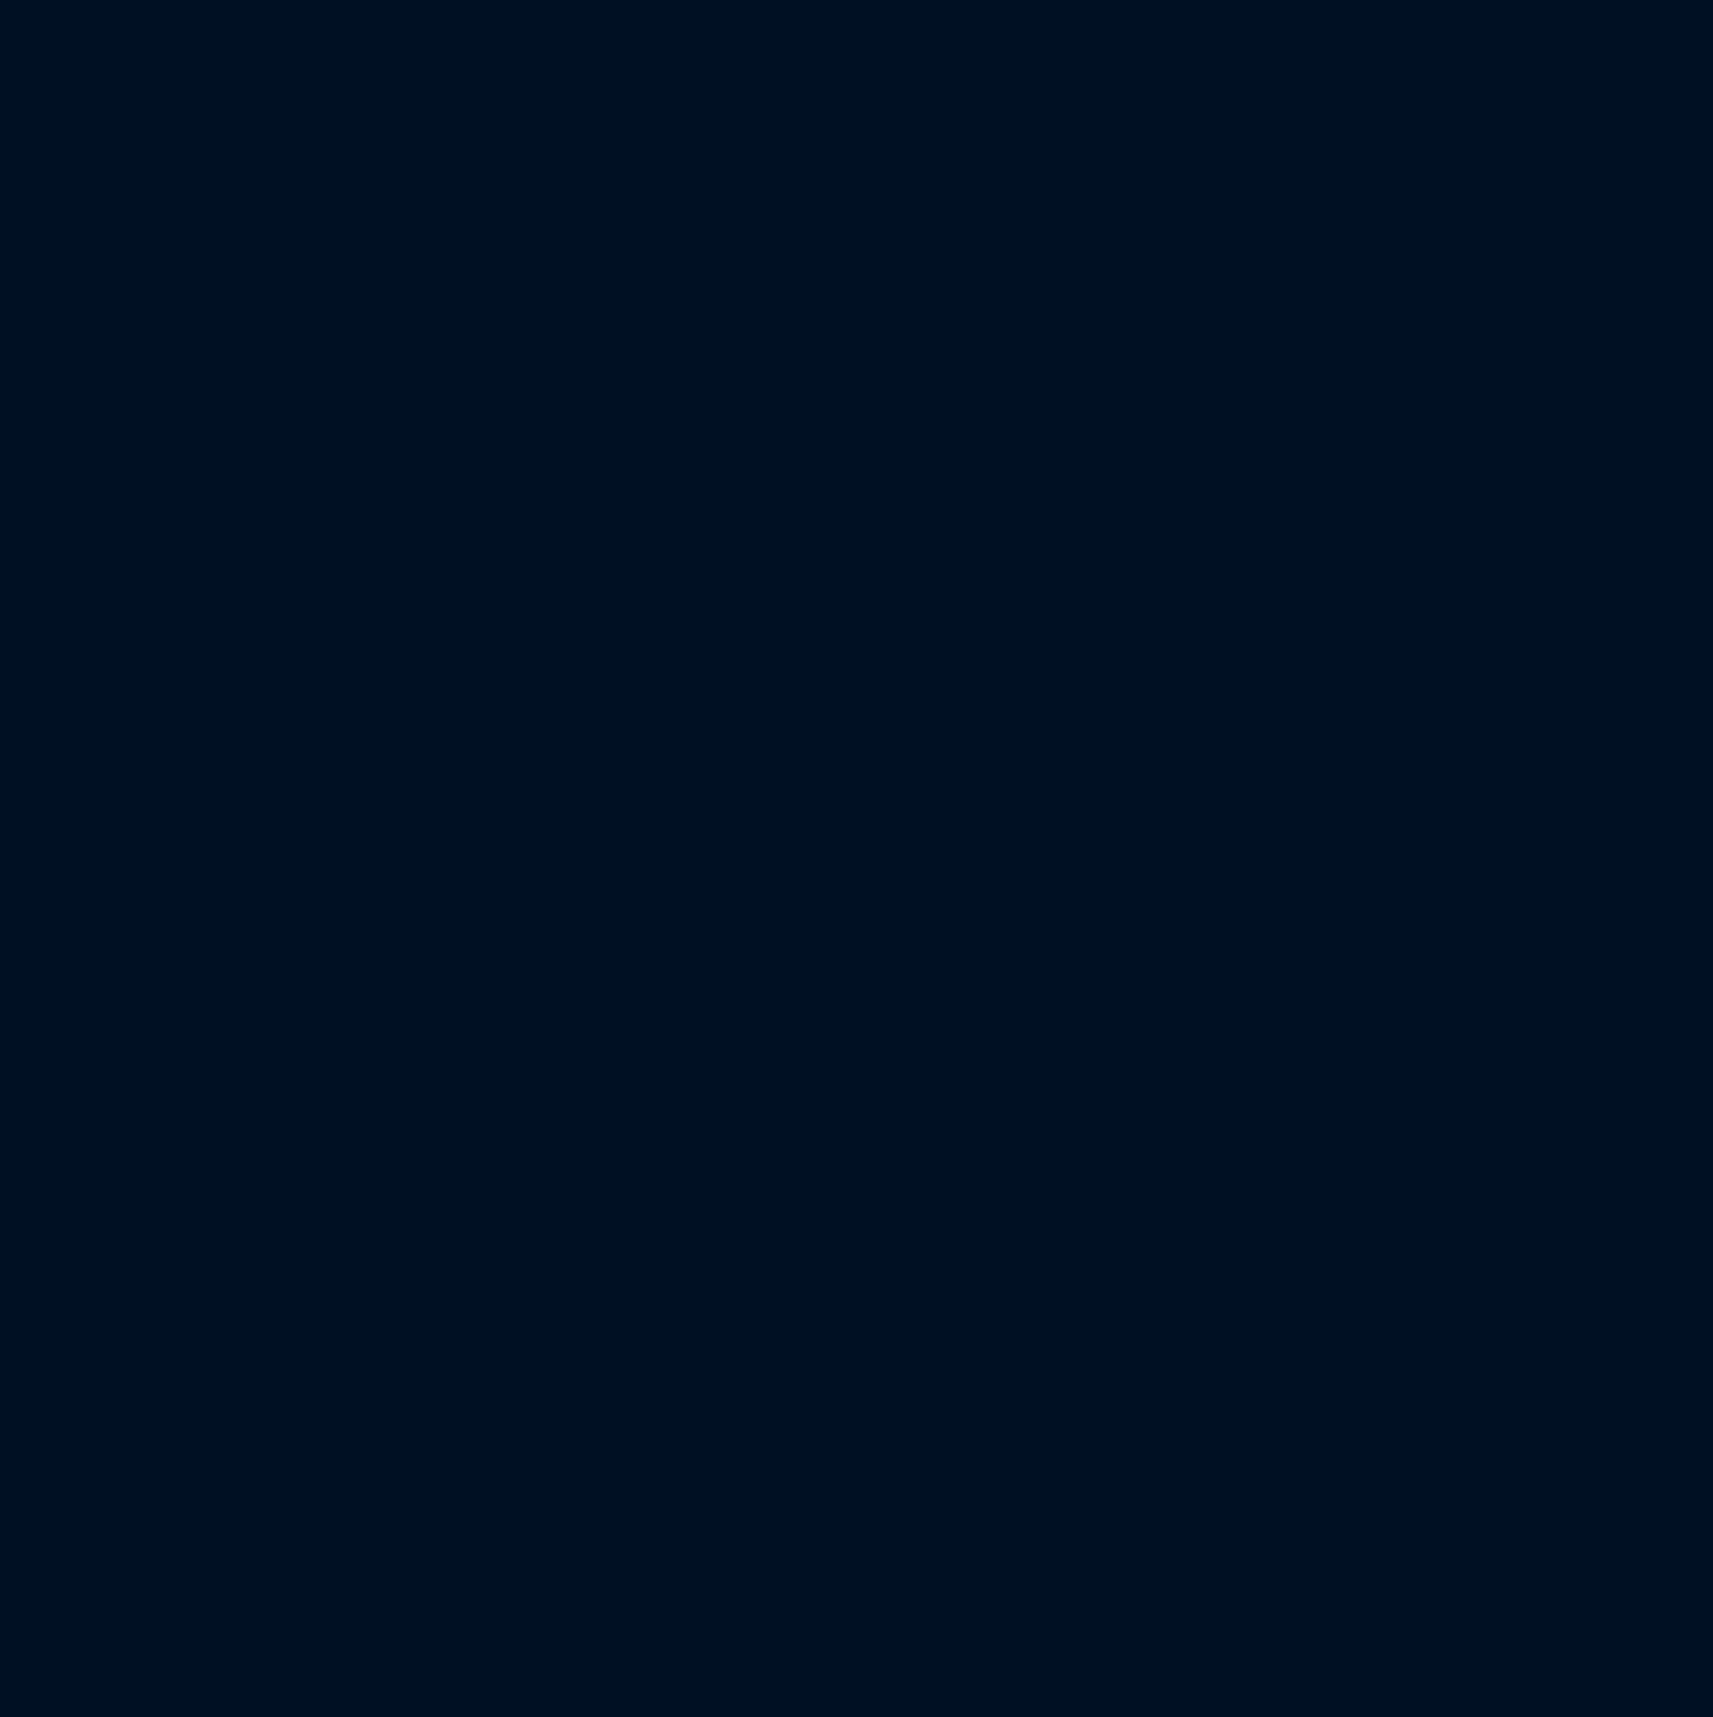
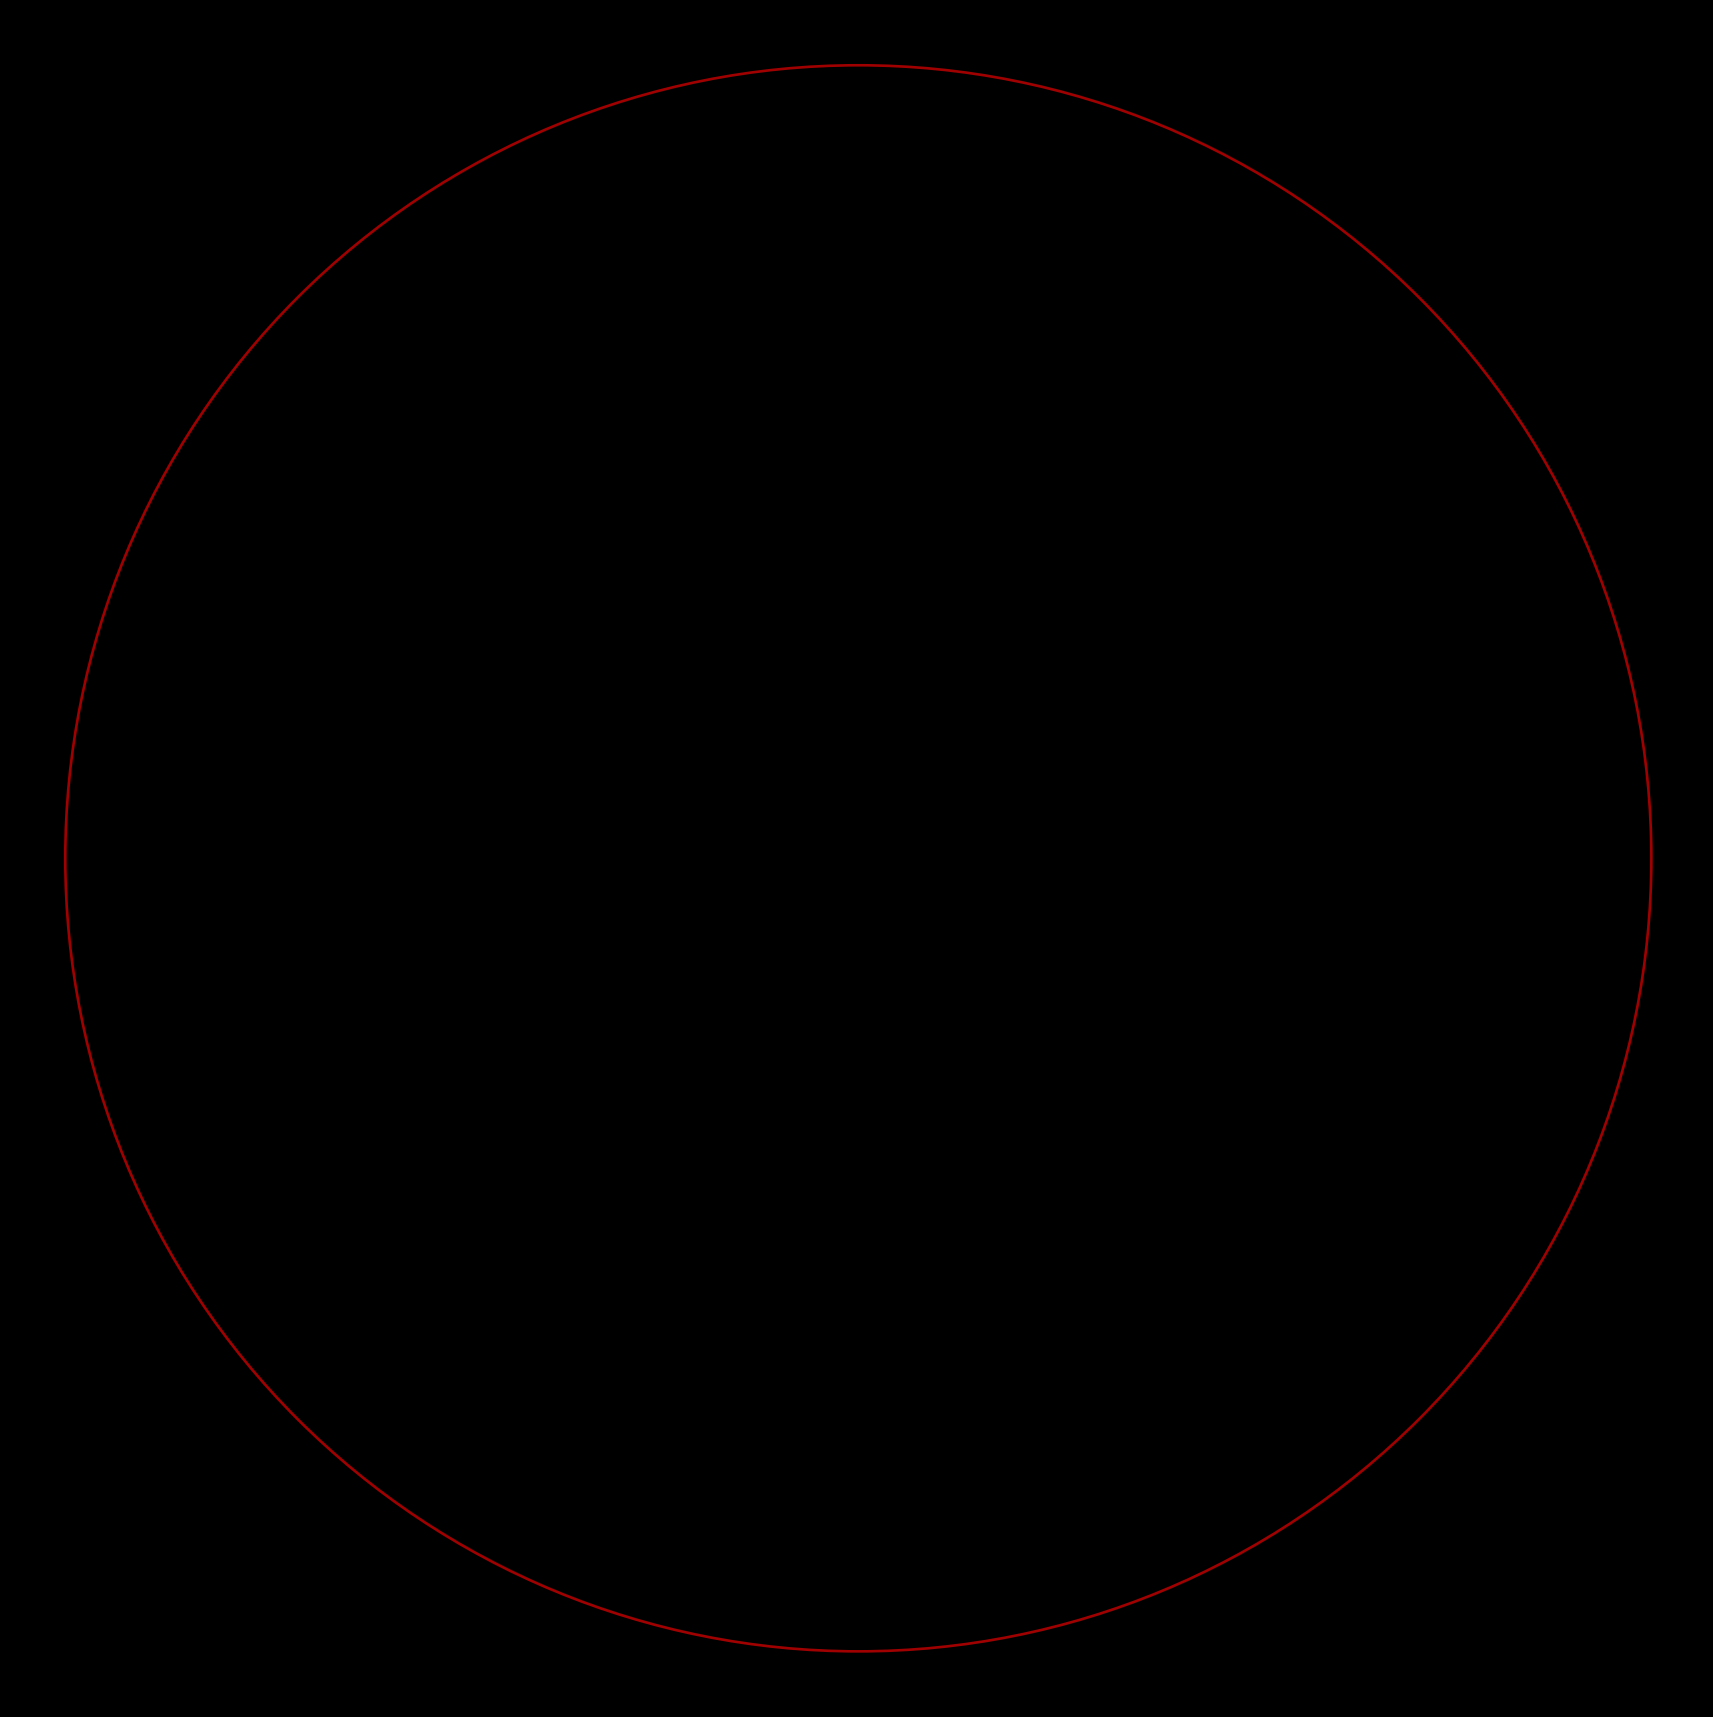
drawing: none -> [63, 63, 1653, 1653]

